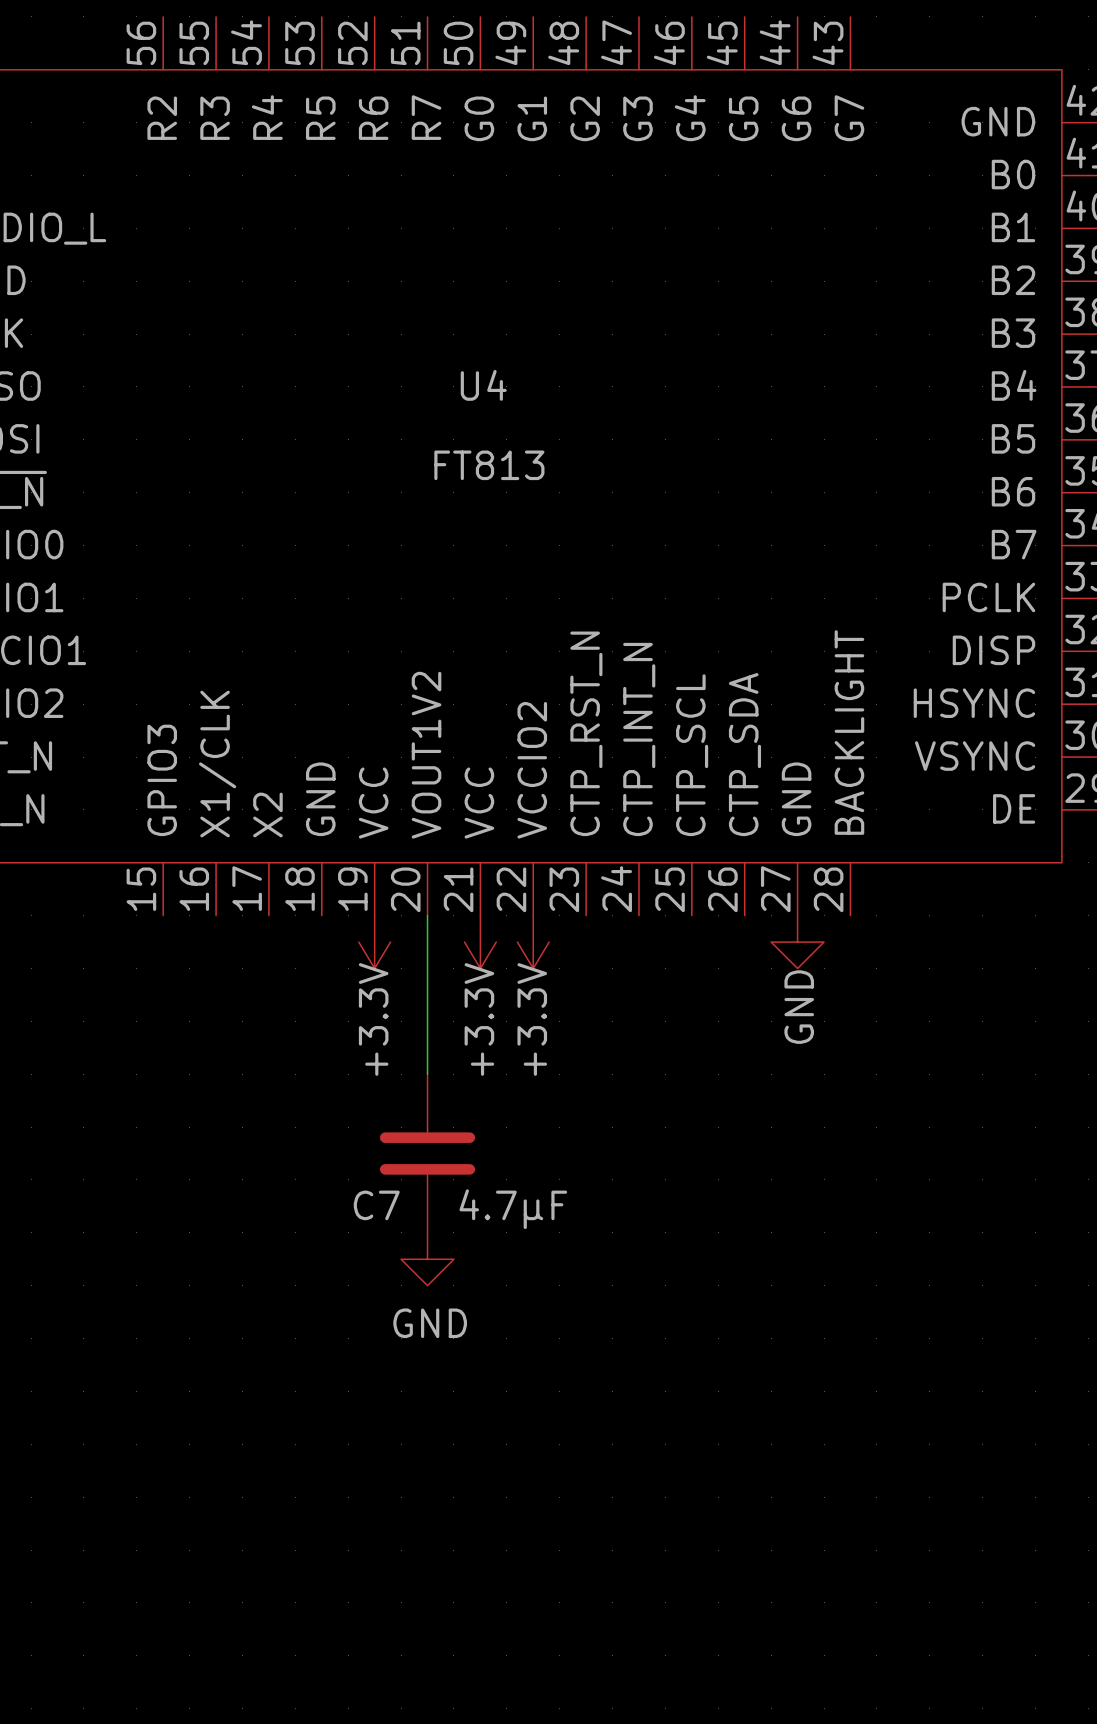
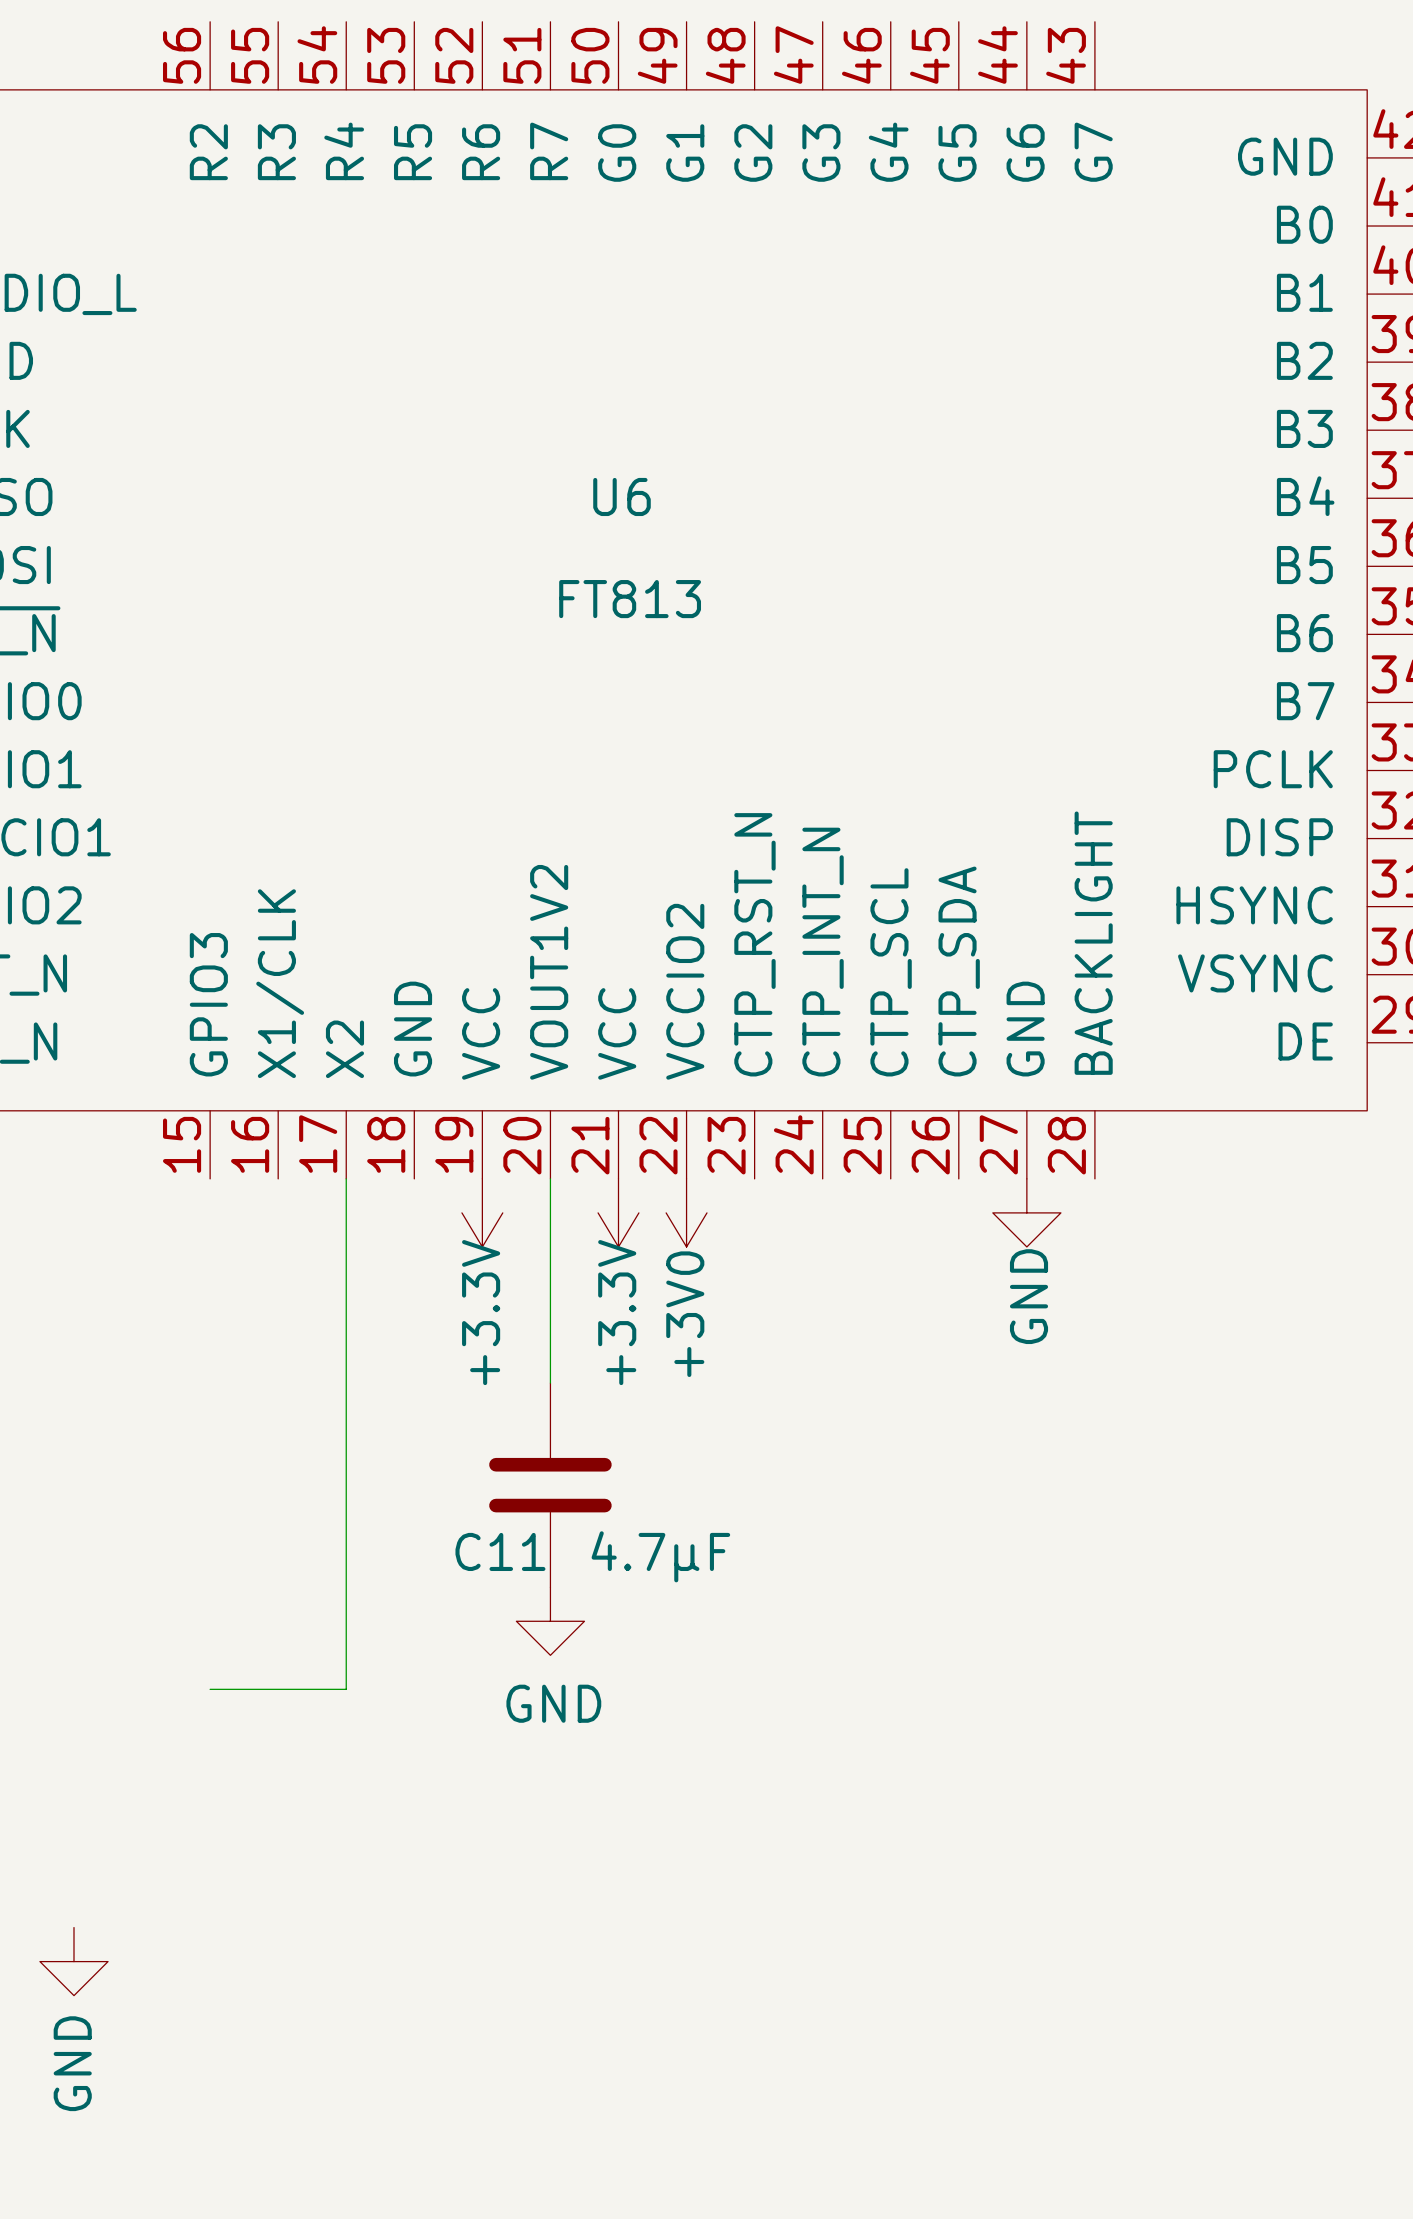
U4 name: U4 (483, 385) -> U6 (621, 496)
wire: none -> (346, 1178) (346, 1689) (210, 1689)
power symbol: +3.3V (533, 942) -> +3V0 (686, 1212)
C7 name: C7 (376, 1205) -> C11 (500, 1551)
power symbol: none -> GND (73, 1961)

